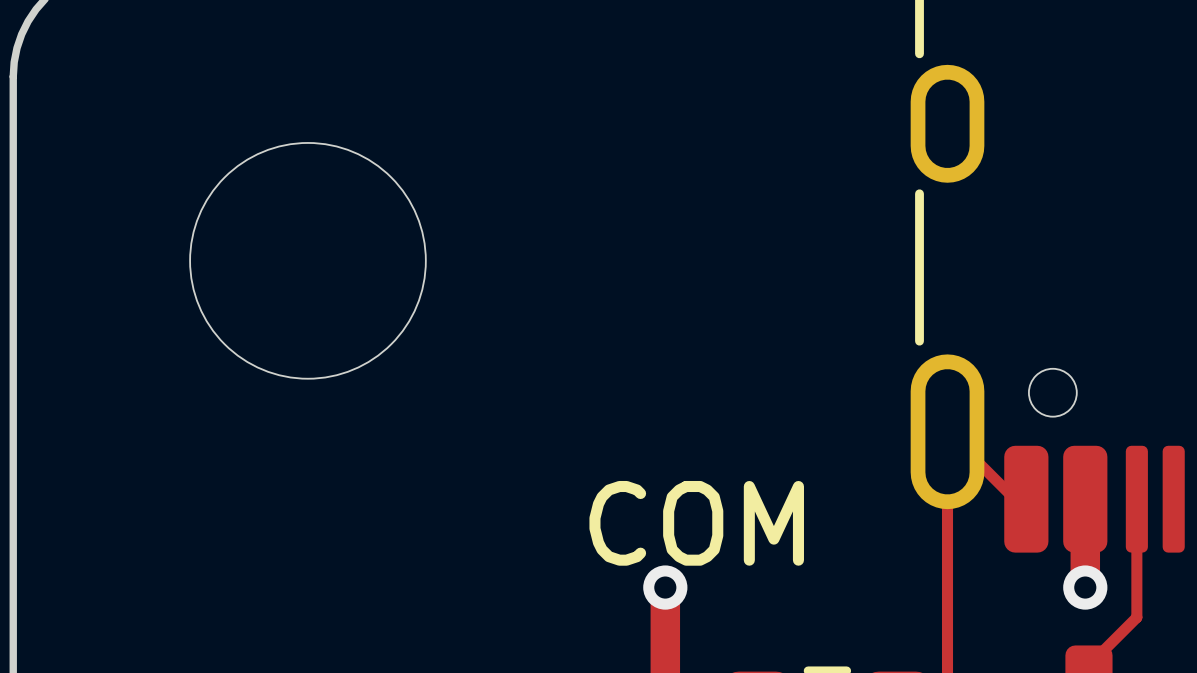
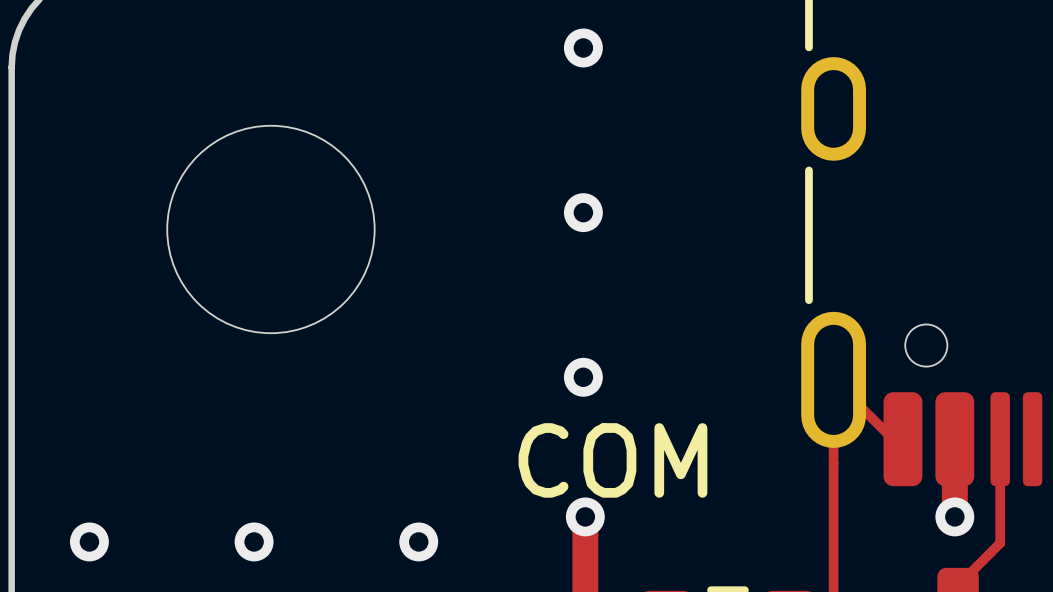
via: none -> (583, 47)
via: none -> (583, 212)
via: none -> (583, 377)
via: none -> (89, 541)
via: none -> (254, 541)
via: none -> (418, 541)

